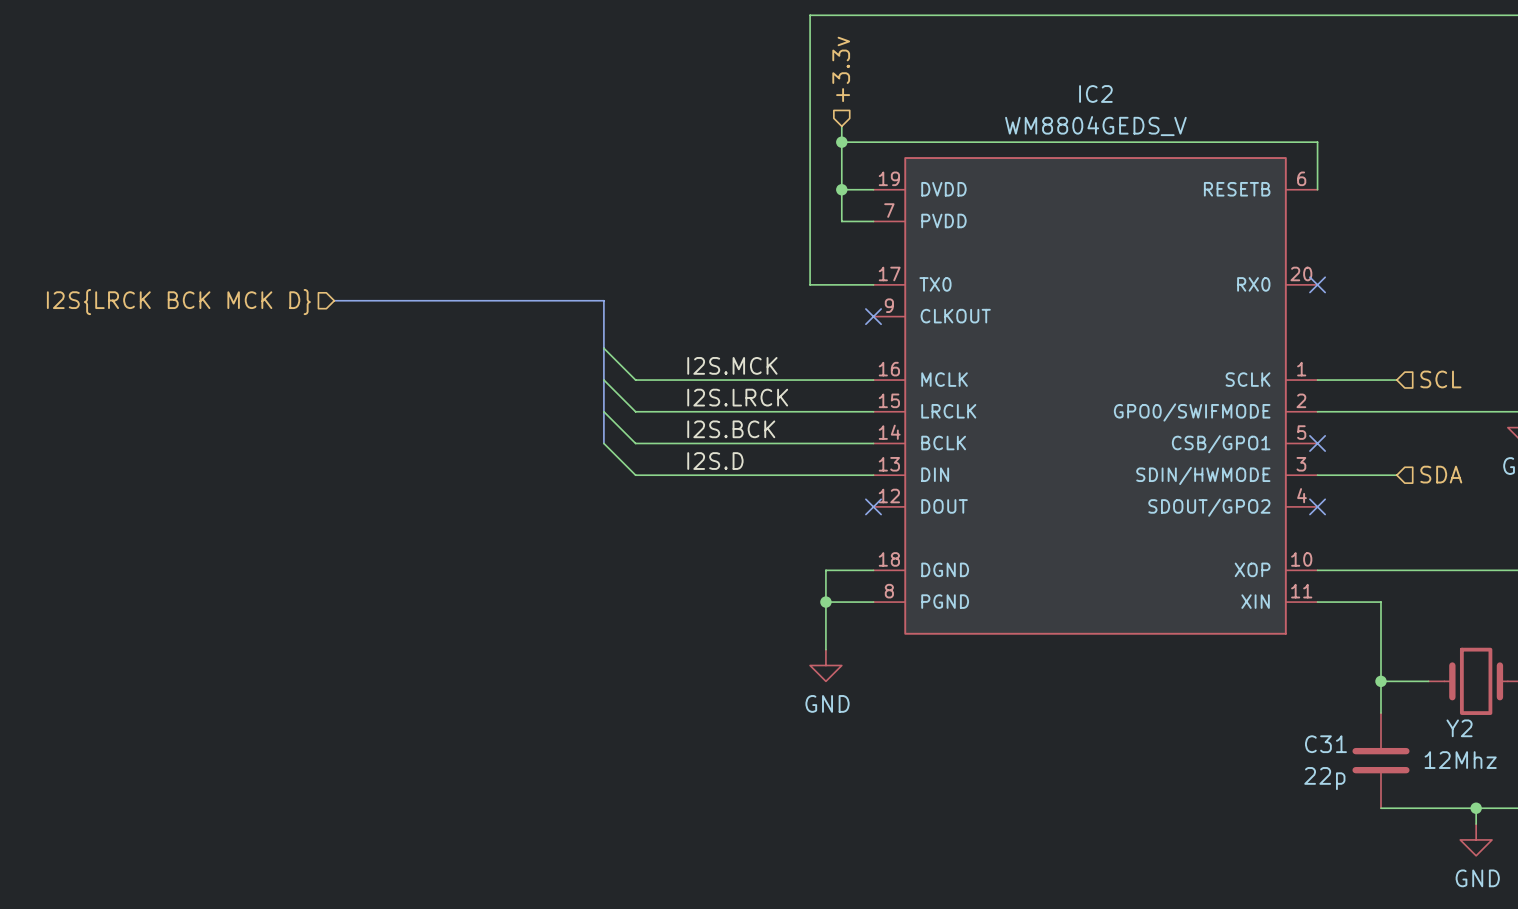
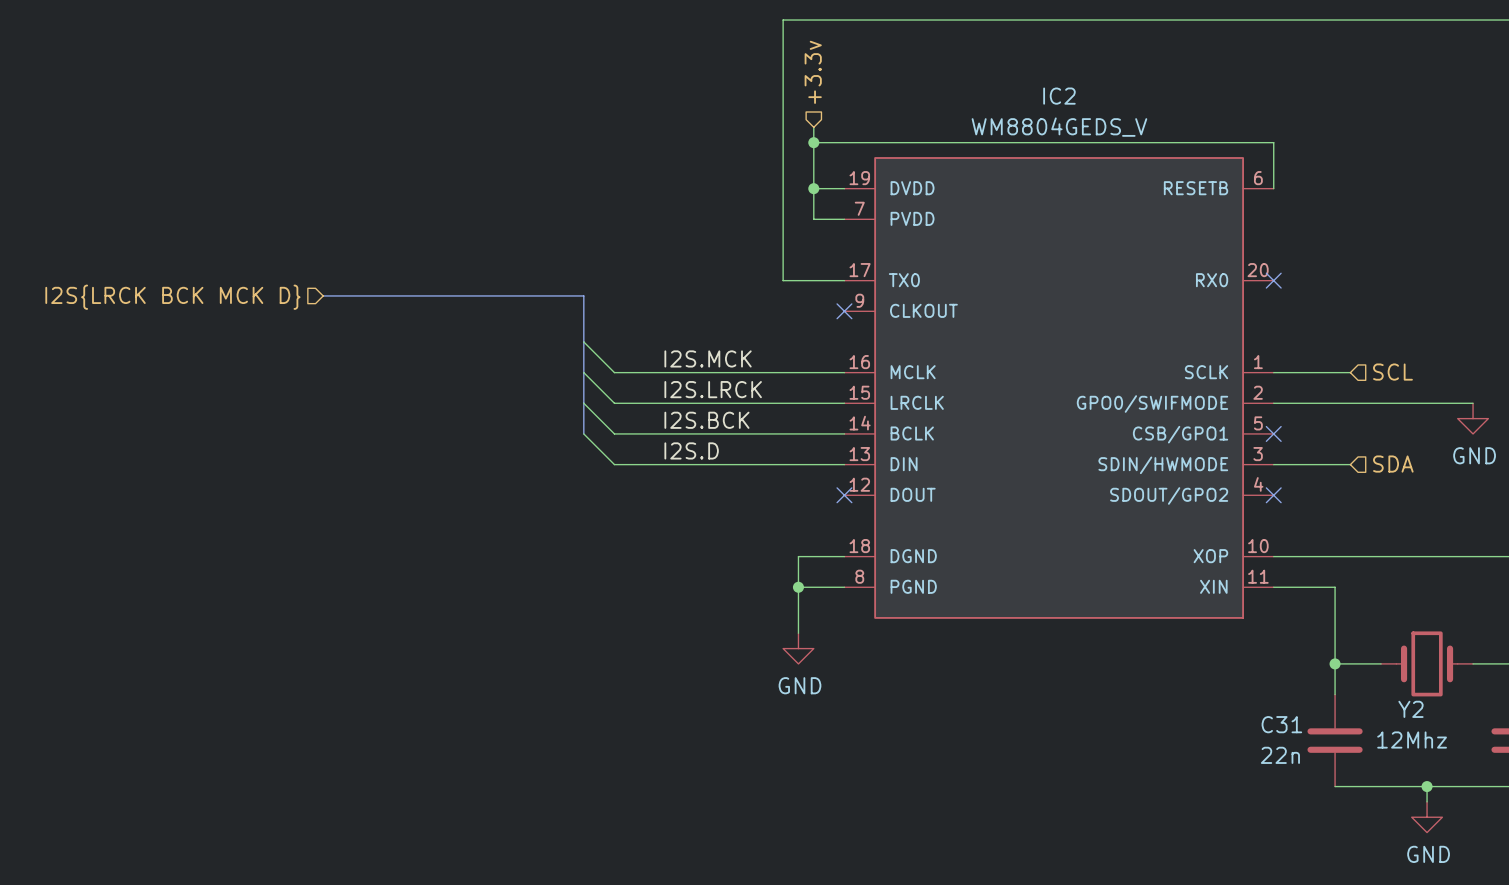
C31 value: 22p (1324, 778) -> 22n (1280, 755)

